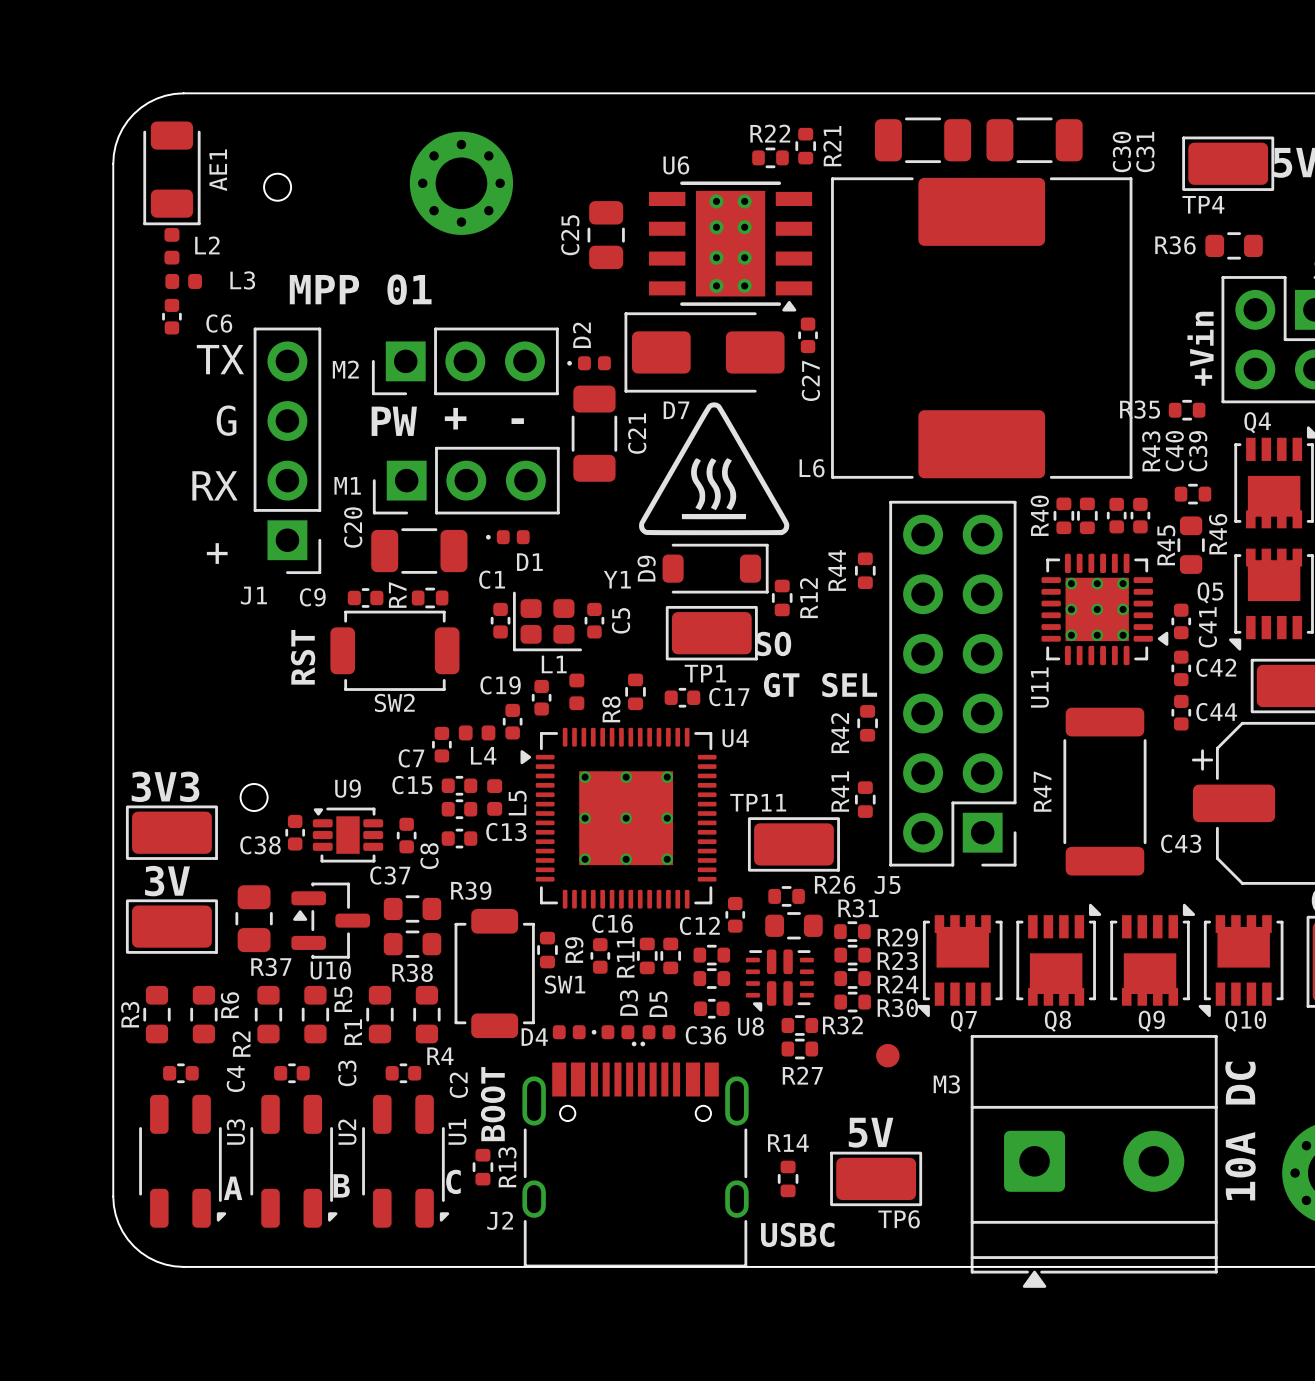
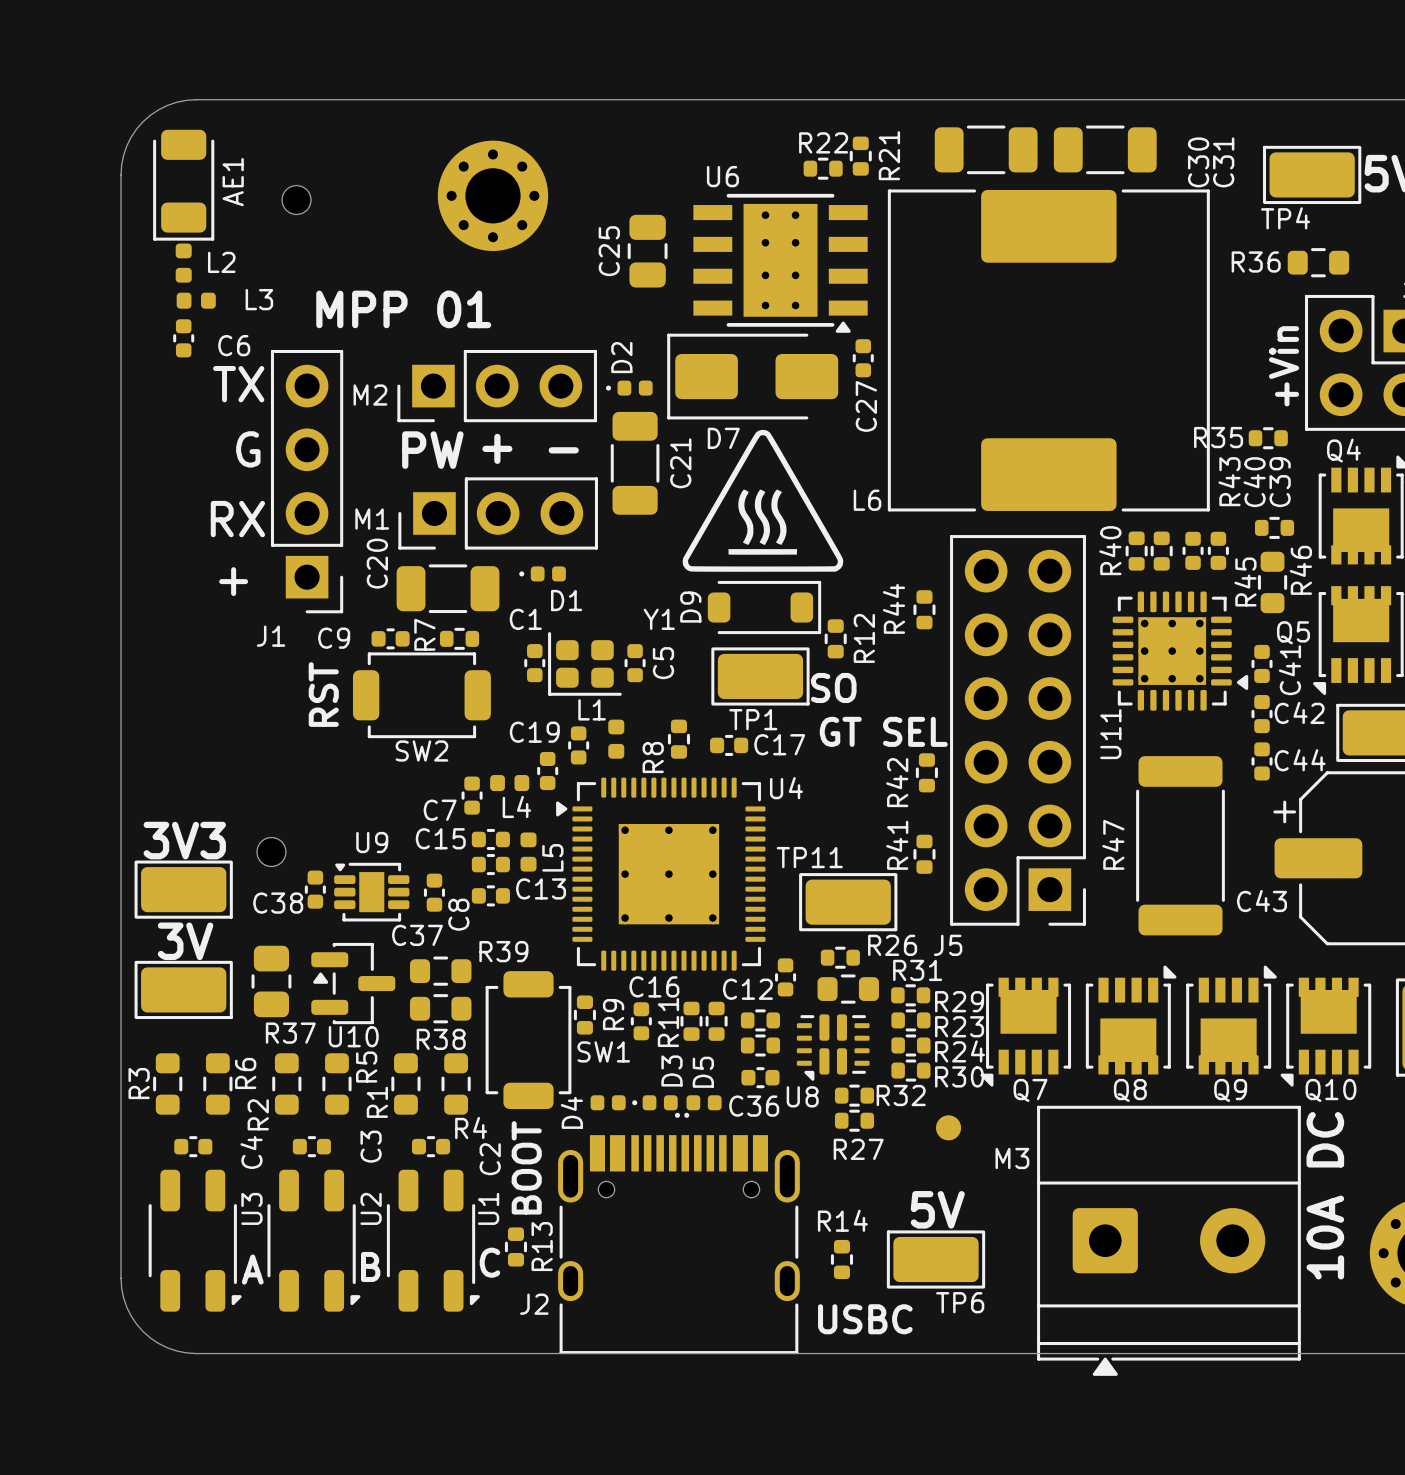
D4 name rotation: 0° (534, 1037) -> 90° counterclockwise (571, 1112)

